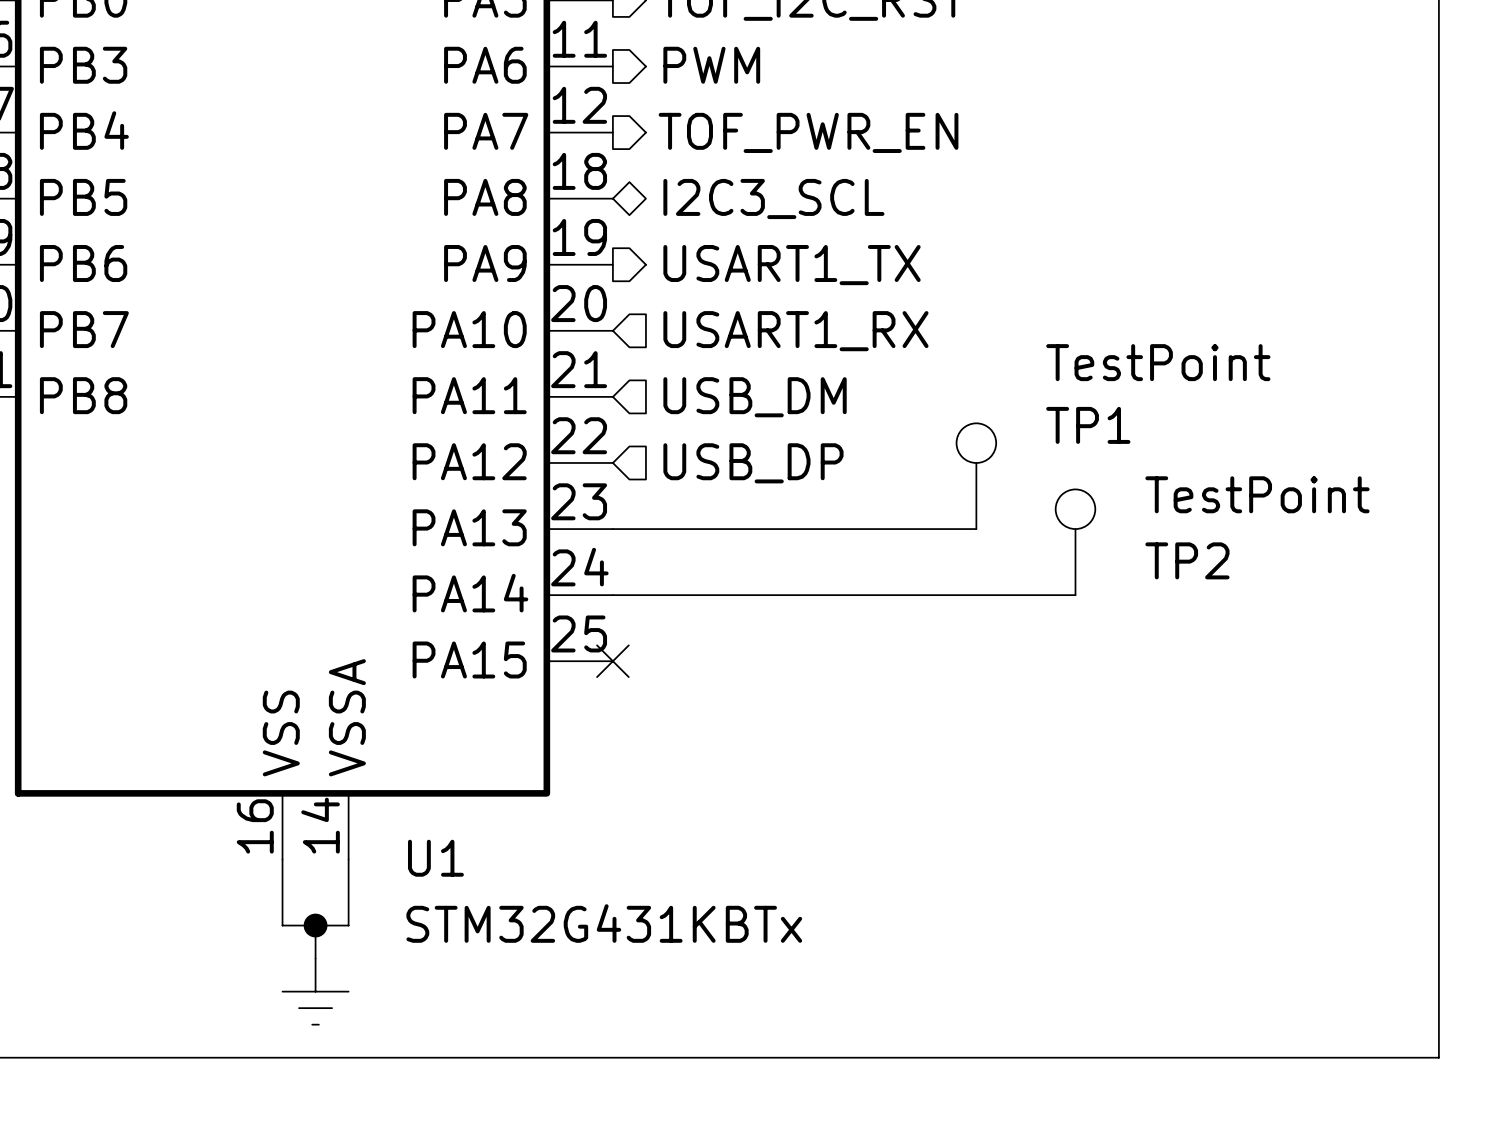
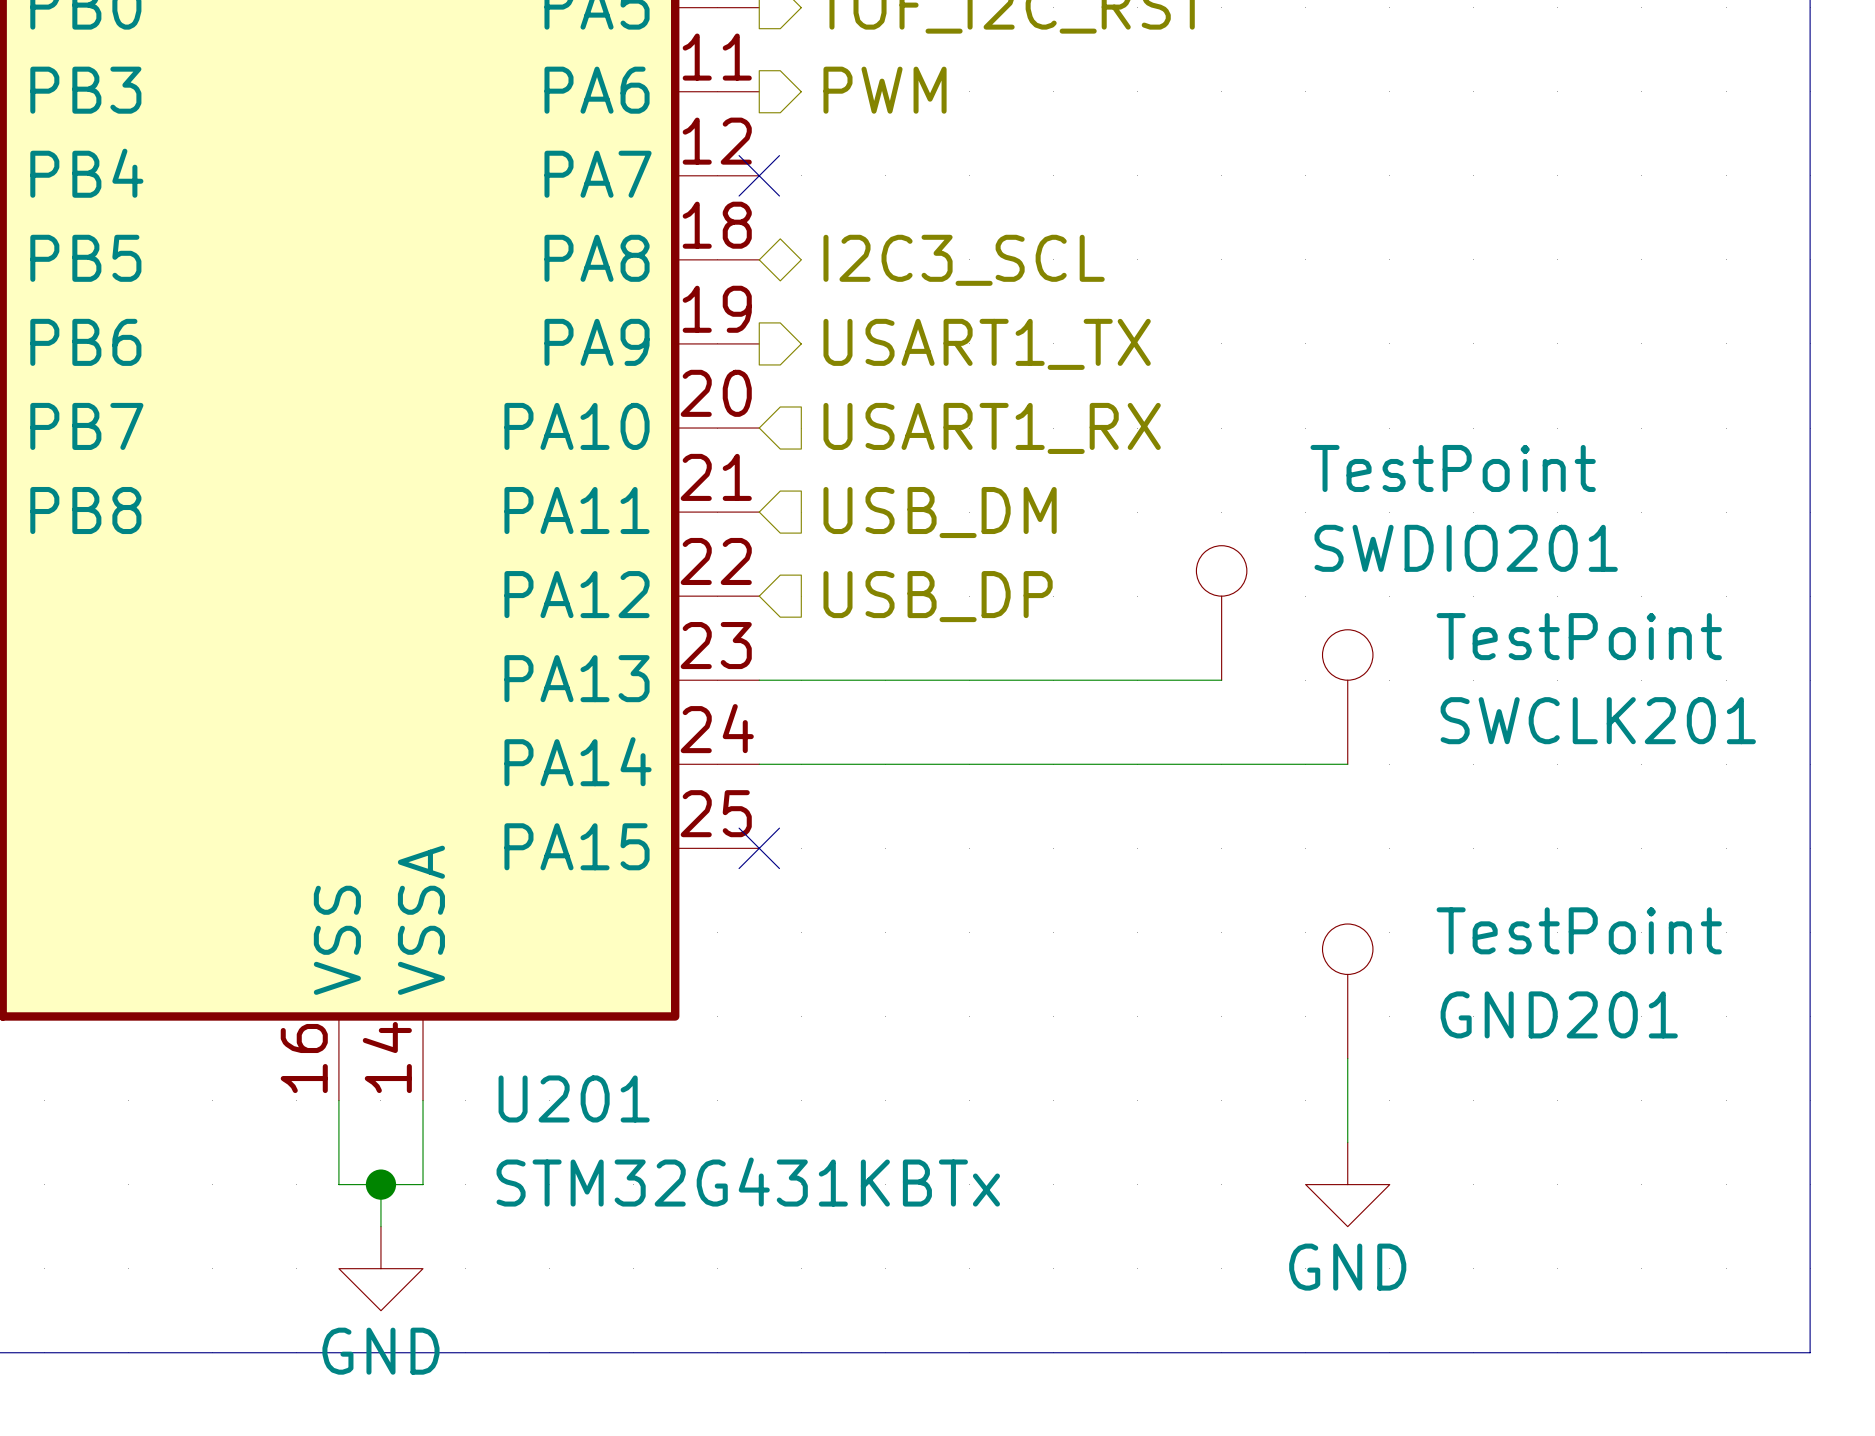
no-connect mark: none -> (759, 175)
hierarchical label: TOF_PWR_EN (808, 132) -> none
TP1 name: TP1 (1088, 425) -> SWDIO201 (1466, 548)
TP2 name: TP2 (1187, 560) -> SWCLK201 (1598, 720)
GND201: none -> TestPoint (1347, 991)
wire: none -> (1347, 1058) (1347, 1142)
U1 name: U1 (435, 858) -> U201 (574, 1098)
power symbol: none -> GND (1347, 1184)
power symbol shape: [282, 958, 349, 1025] -> [338, 1226, 424, 1311]
power symbol text: none -> GND (380, 1351)

